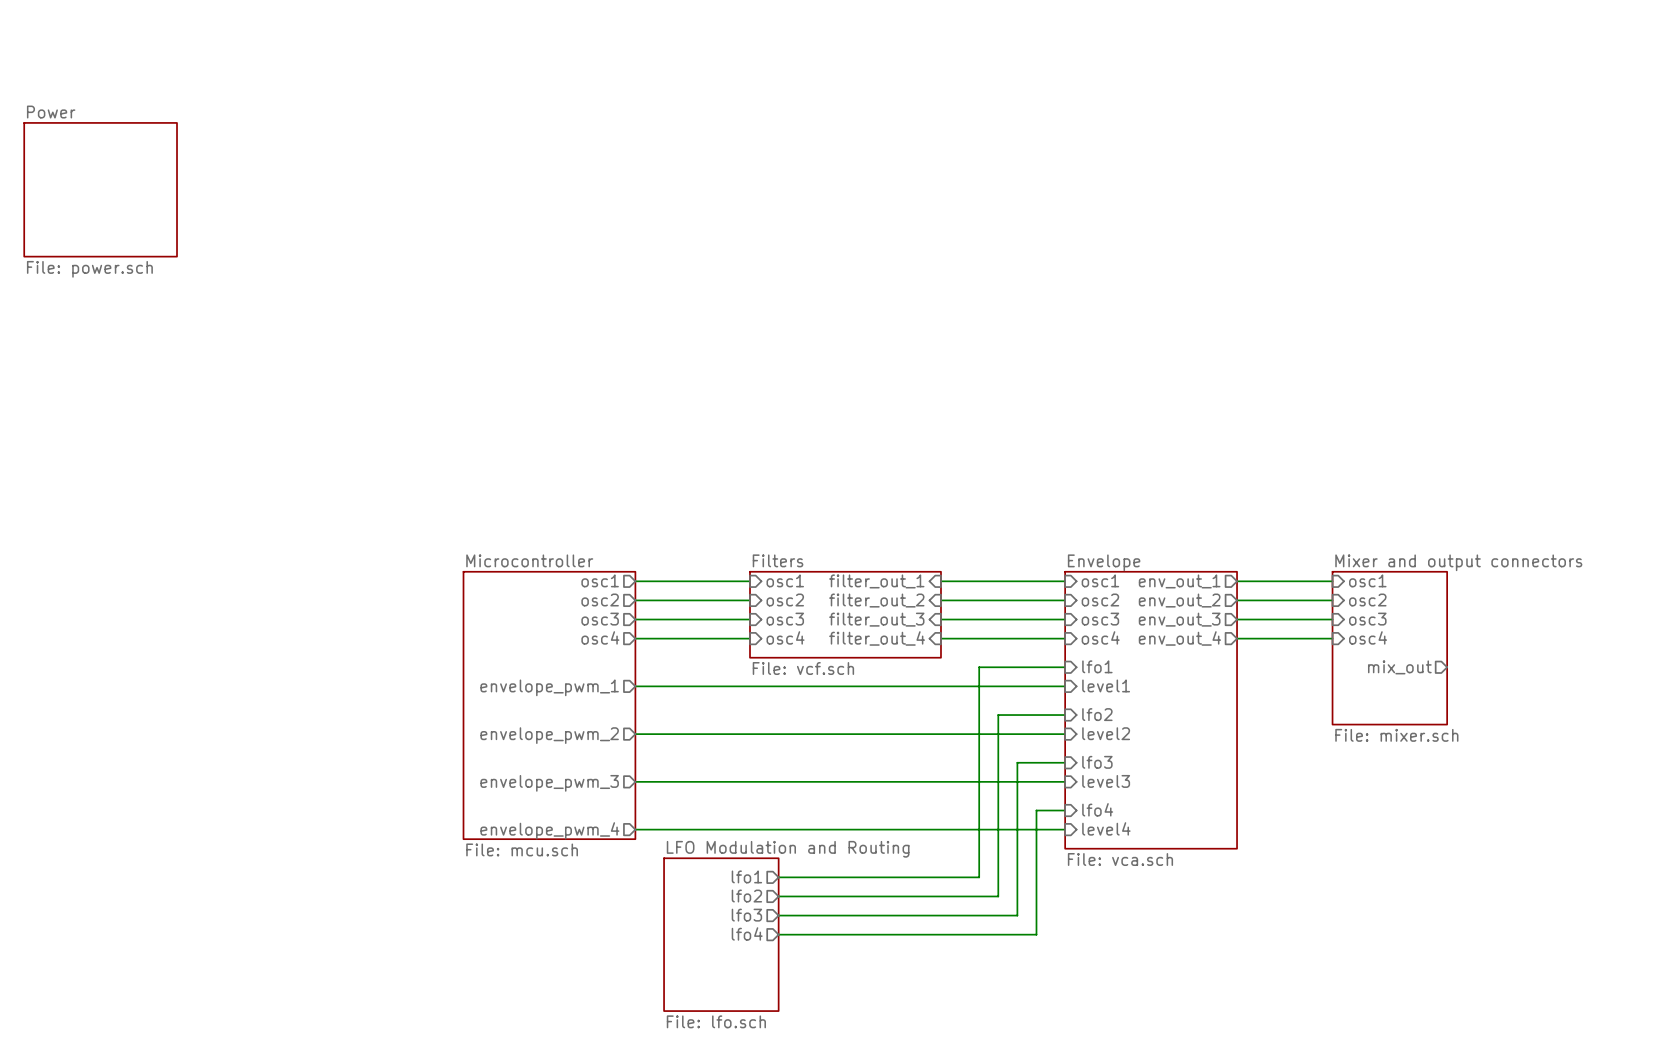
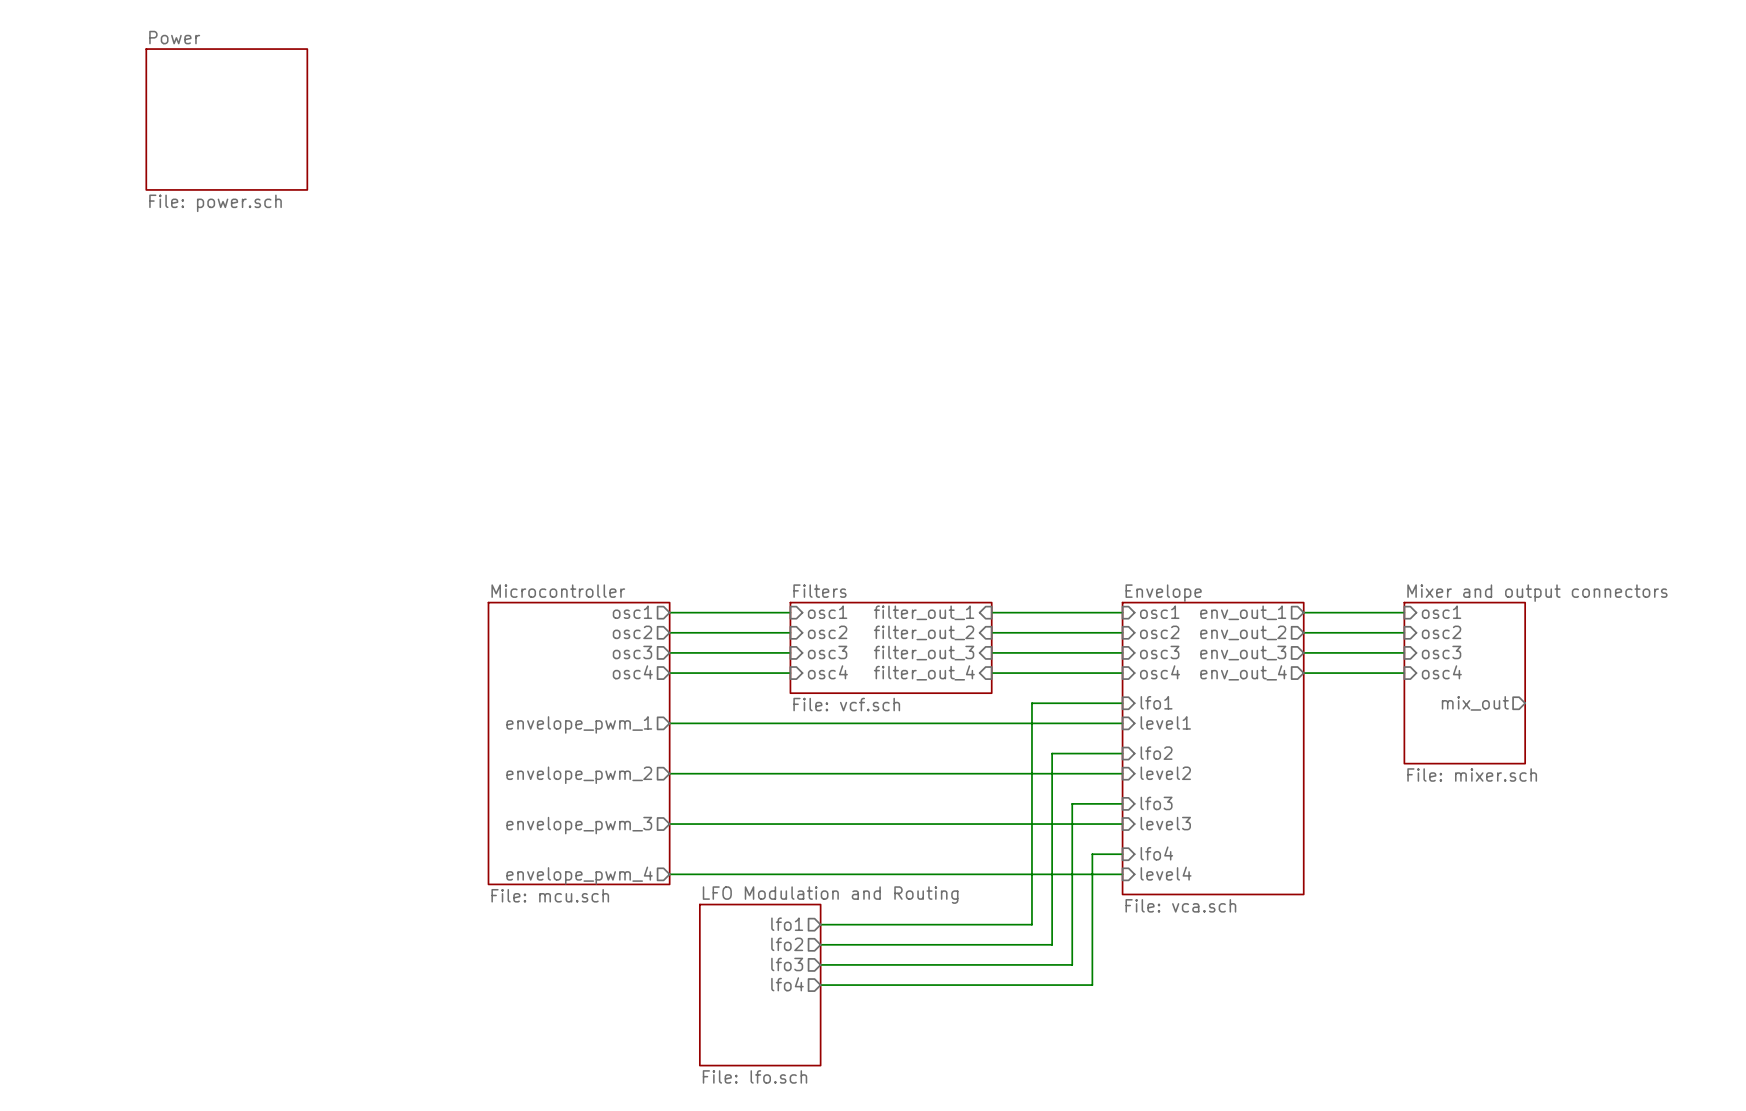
sheet Power position: (100, 189) -> (226, 119)

